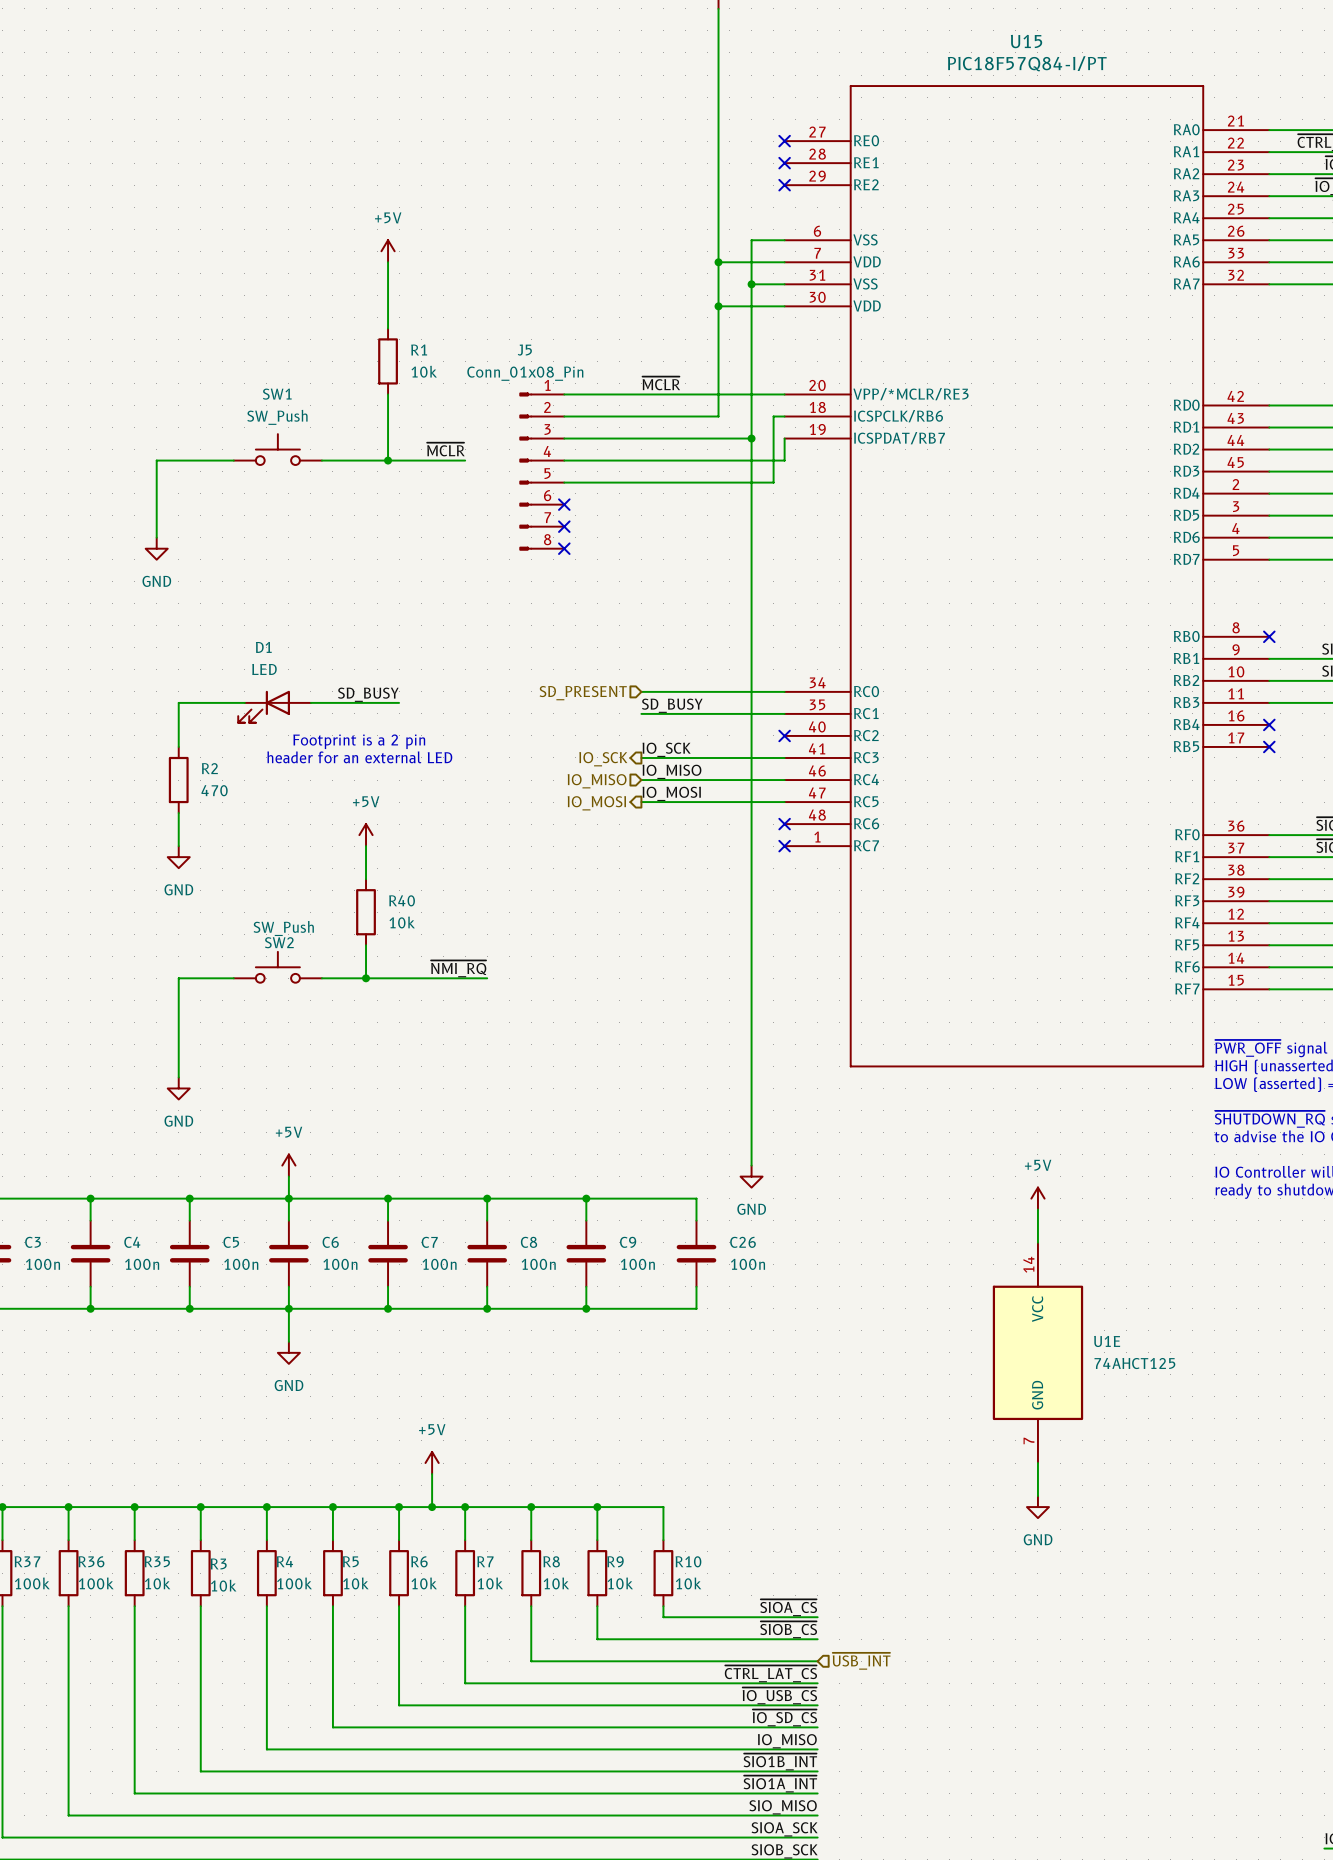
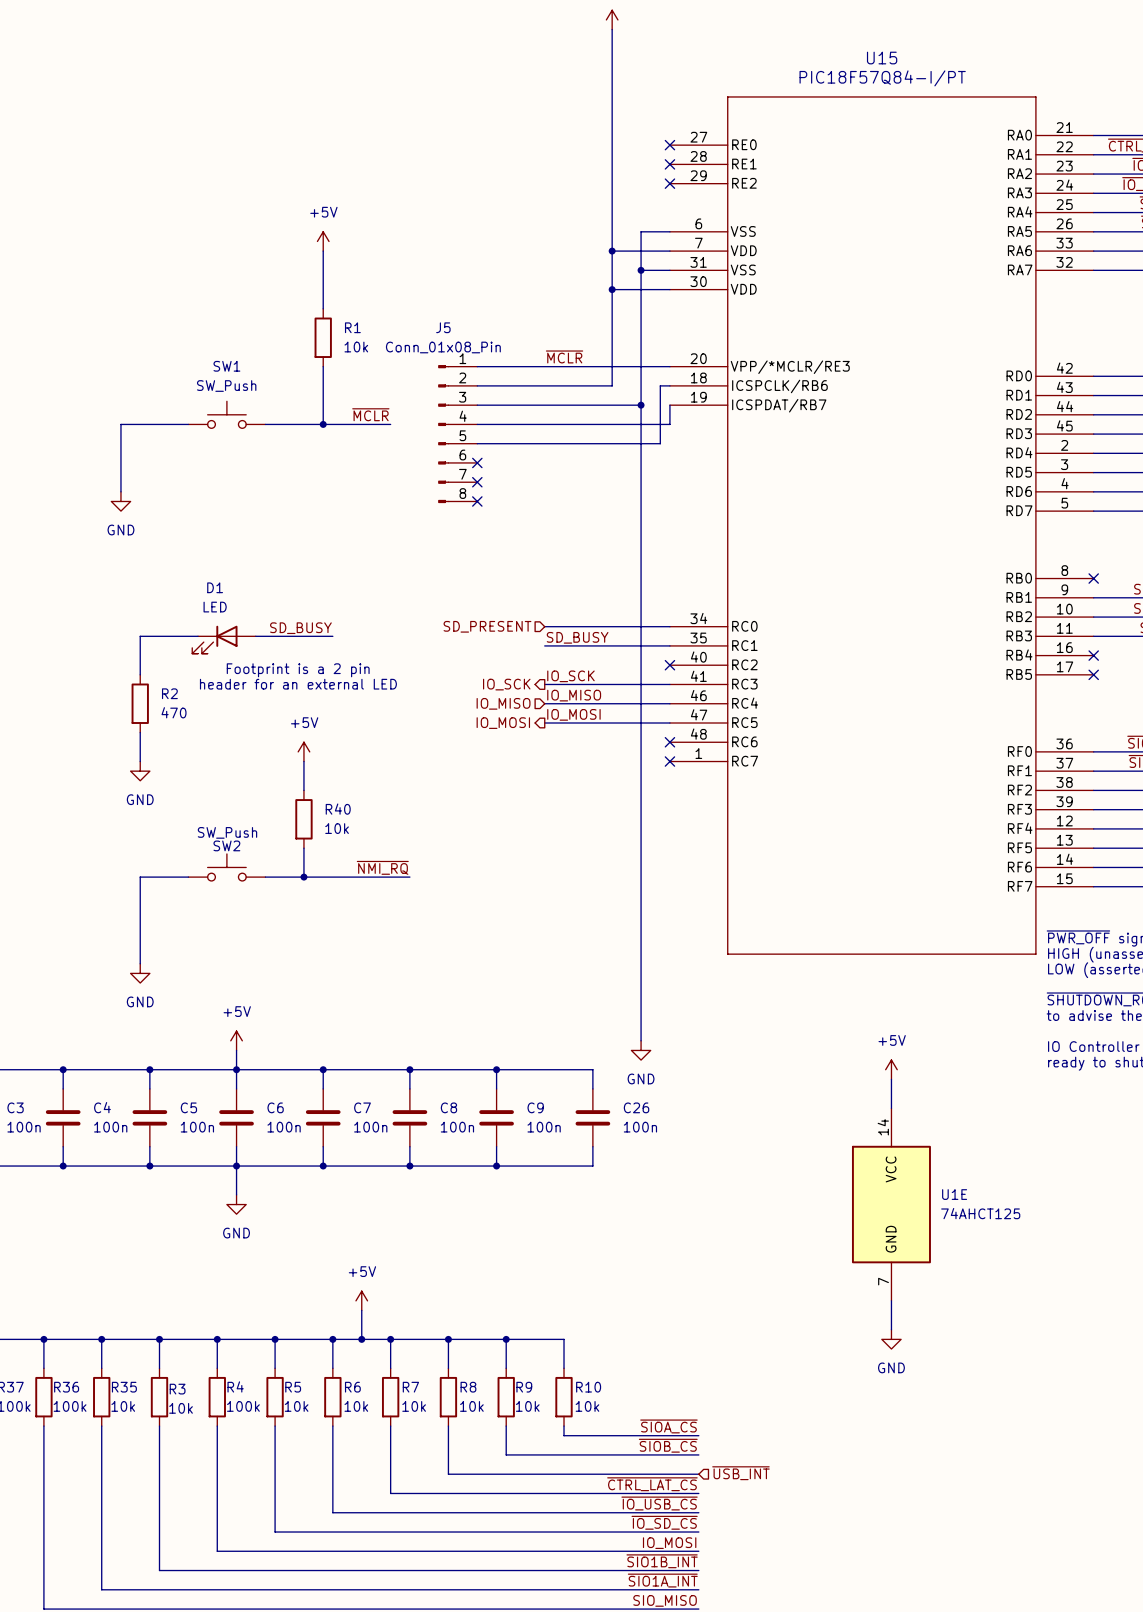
label: IO_MISO (787, 1741) -> IO_MOSI (669, 1543)

